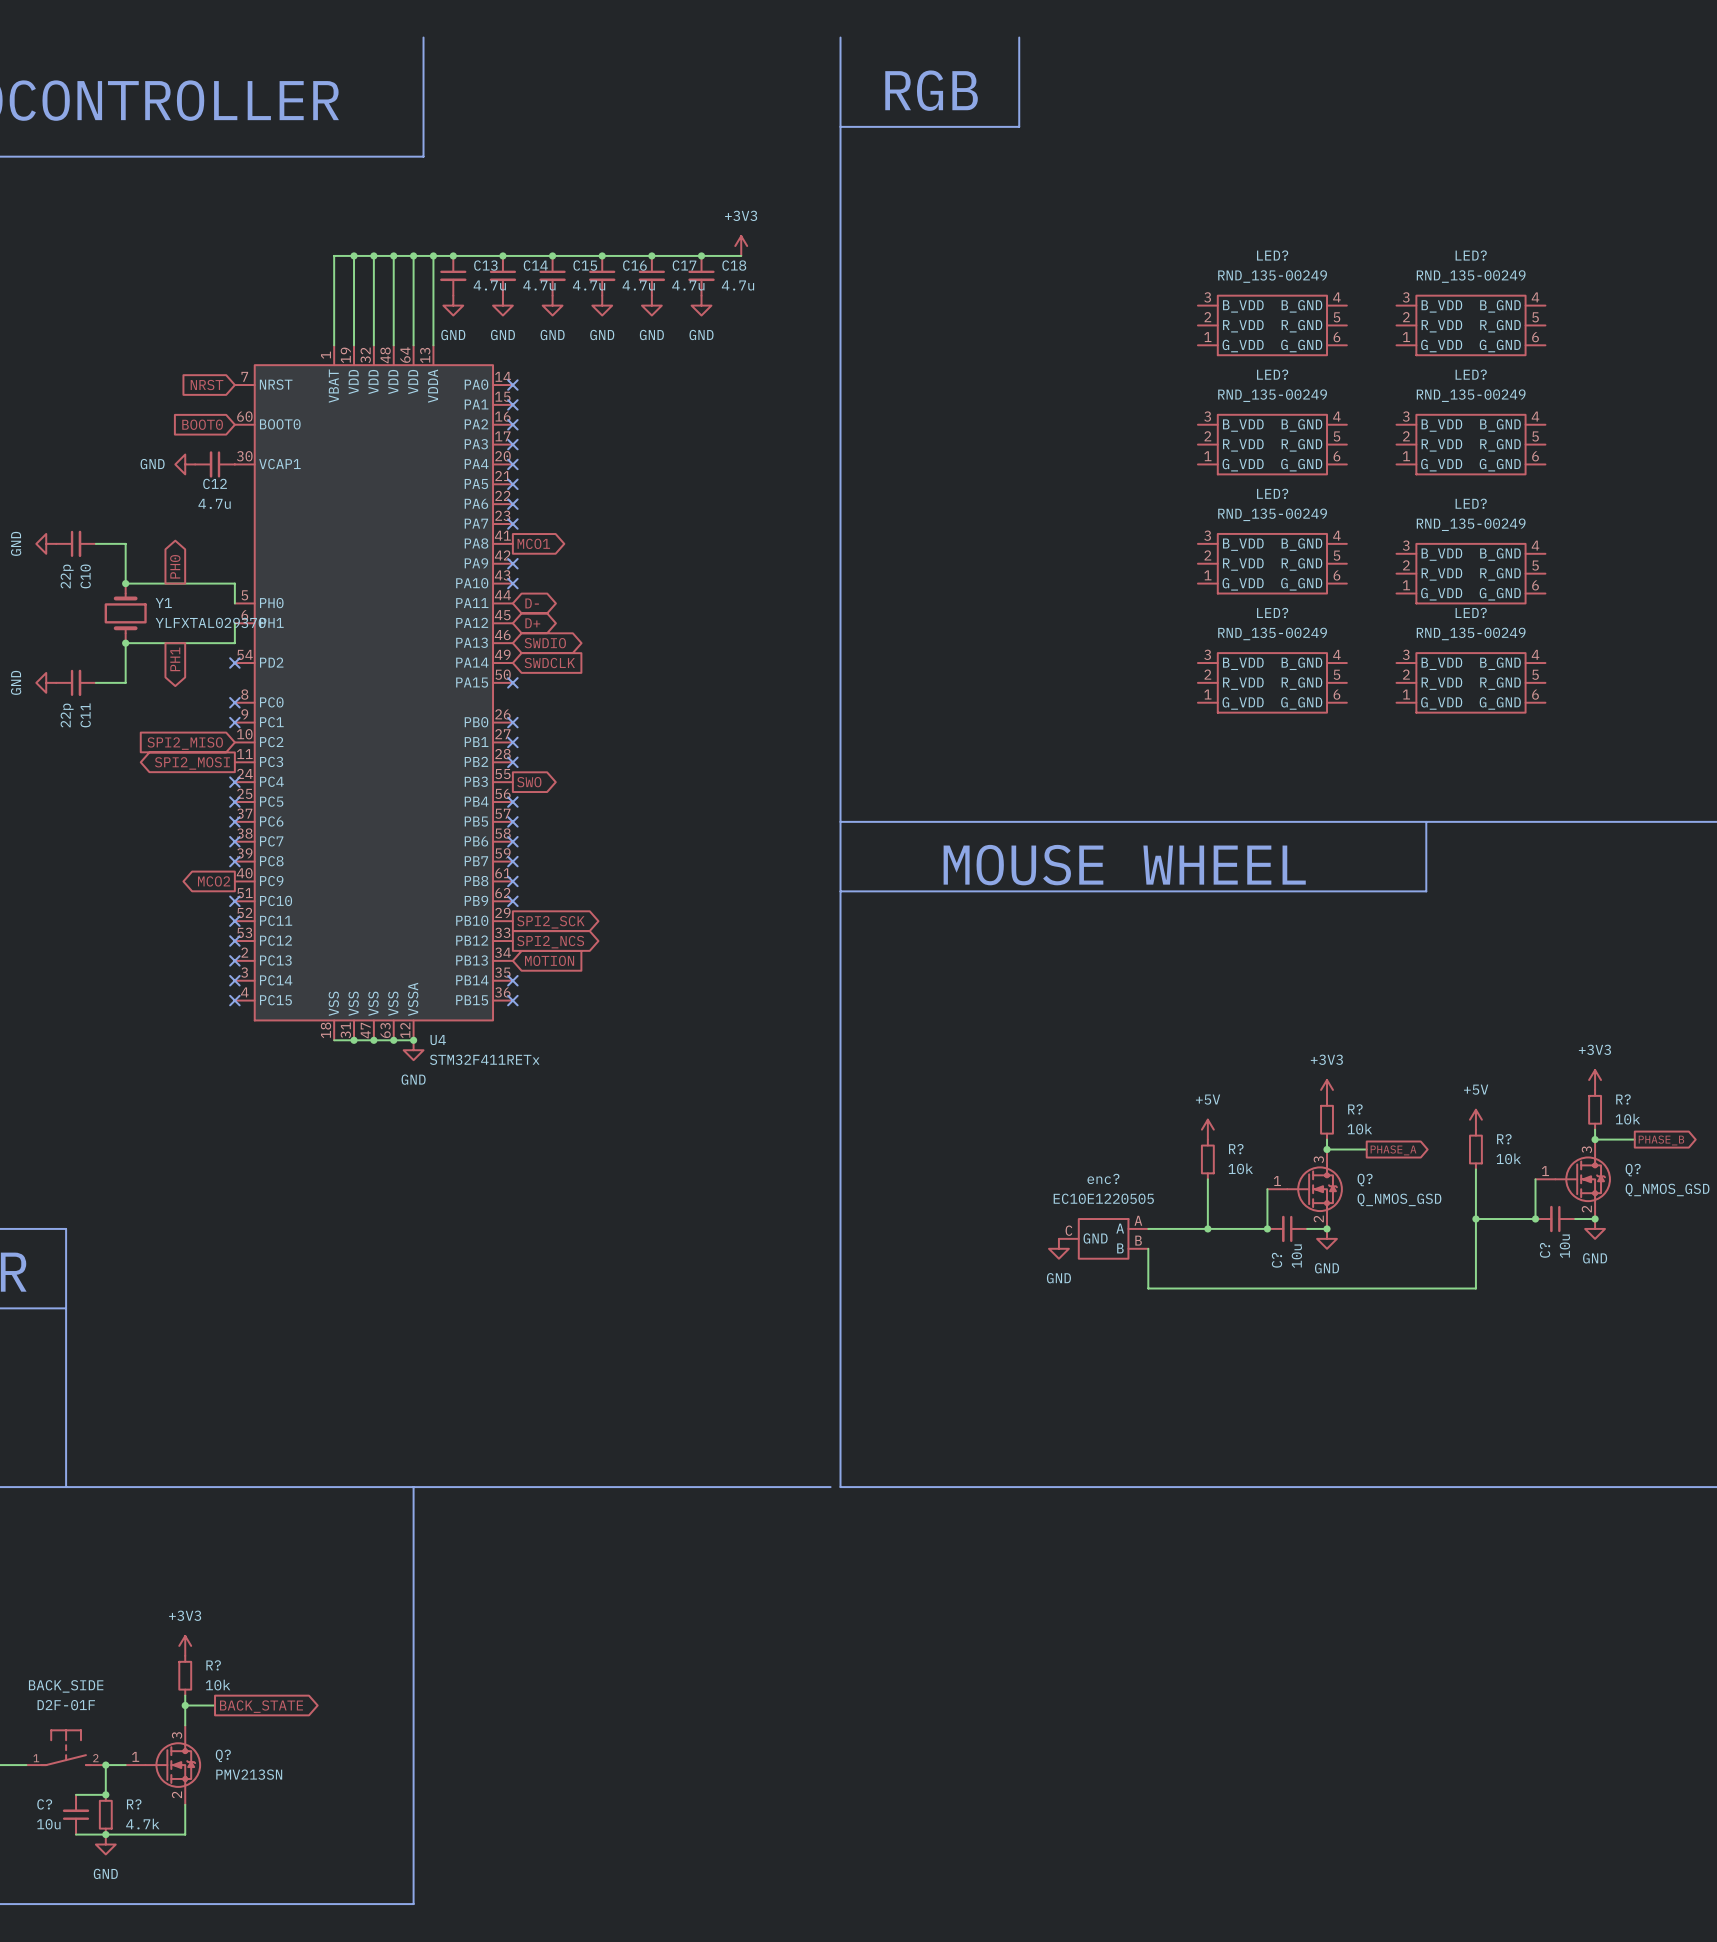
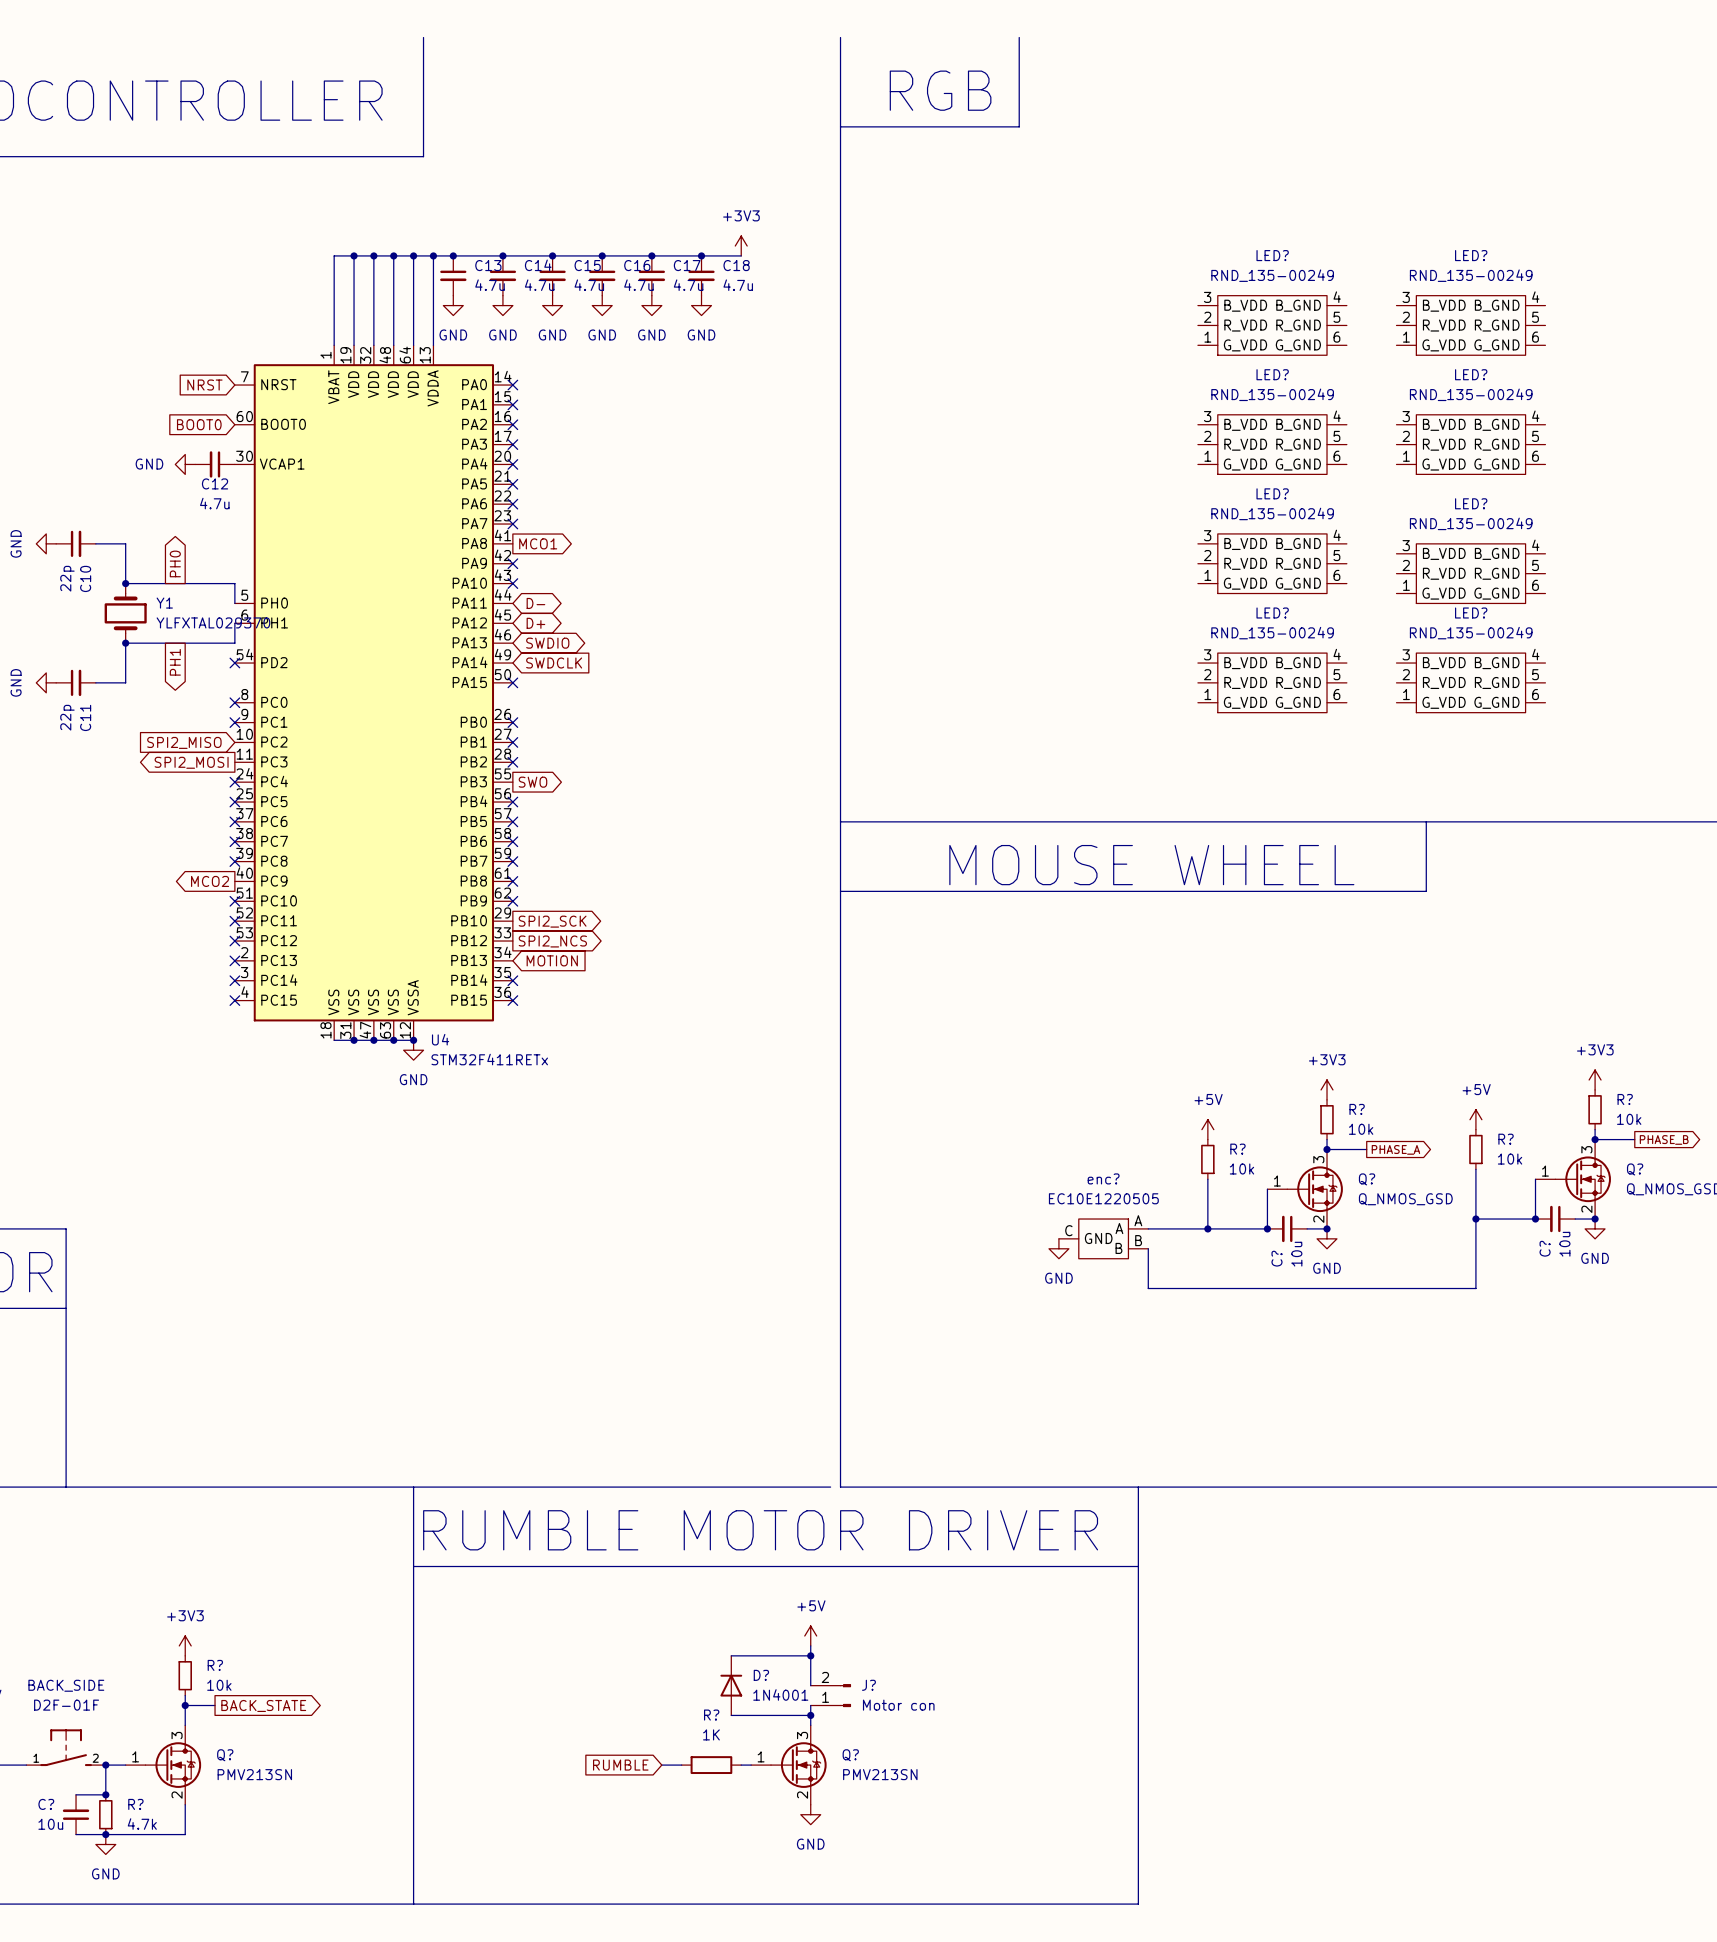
line: none -> (1138, 1487) (1138, 1904) (413, 1904)
text: none -> RUMBLE MOTOR DRIVER (760, 1530)
line: none -> (413, 1566) (1138, 1566)
power symbol: none -> +5V (810, 1636)
wire: none -> (810, 1645) (810, 1685)
wire: none -> (731, 1655) (810, 1655)
junction: none -> (810, 1655)
D?: none -> 1N4001 (731, 1685)
J?: none -> Motor con (830, 1695)
wire: none -> (810, 1705) (810, 1725)
wire: none -> (731, 1715) (810, 1715)
junction: none -> (810, 1715)
global label: none -> RUMBLE (620, 1765)
wire: none -> (661, 1765) (681, 1765)
R?: none -> 1K (711, 1765)
wire: none -> (741, 1765) (751, 1765)
Q?: none -> PMV213SN (788, 1765)
power symbol: none -> GND (810, 1814)

